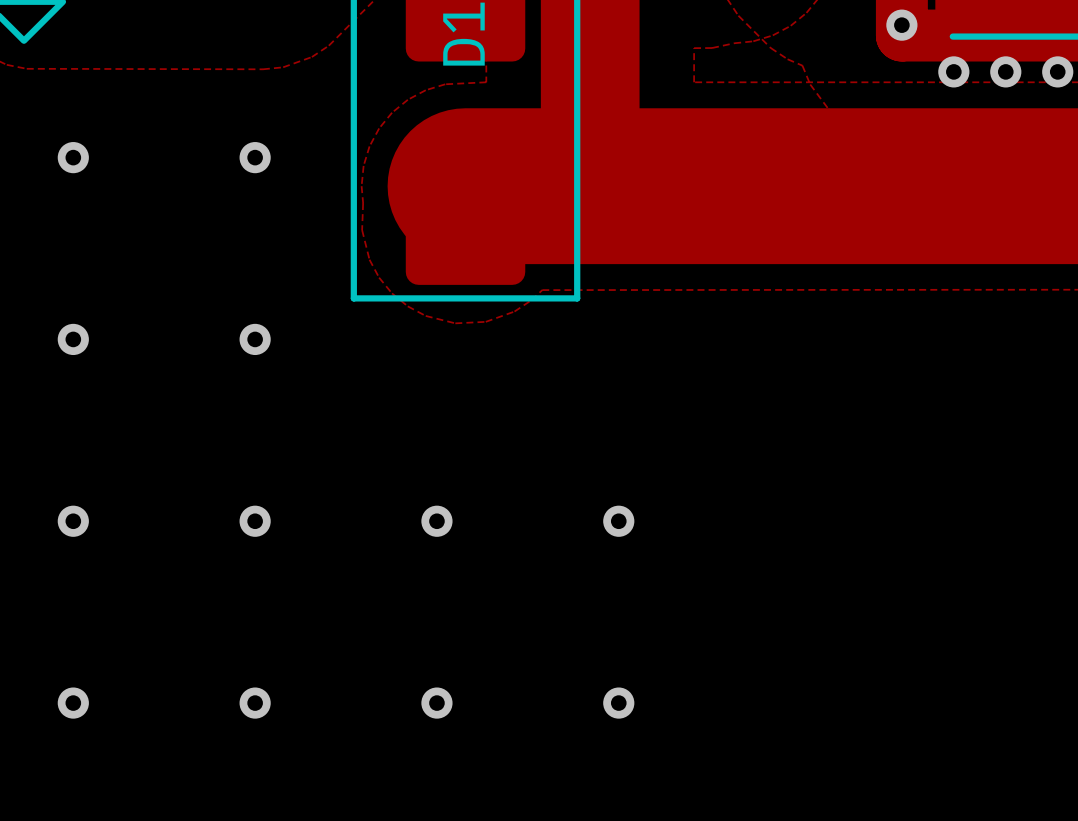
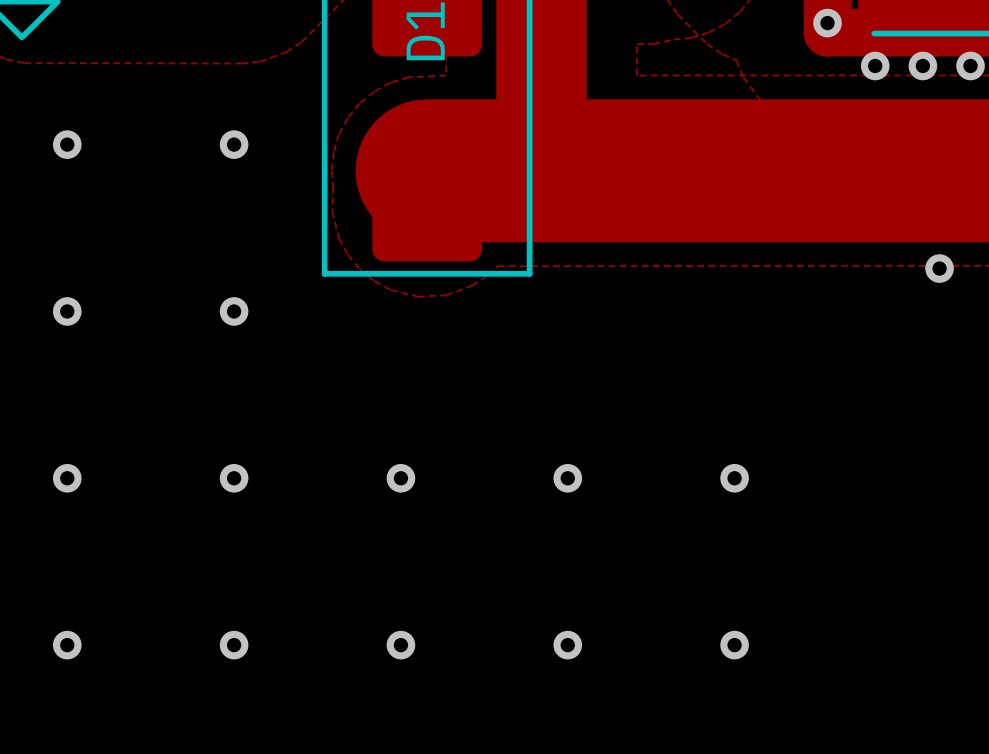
via: none -> (939, 268)
via: none -> (734, 478)
via: none -> (734, 645)

